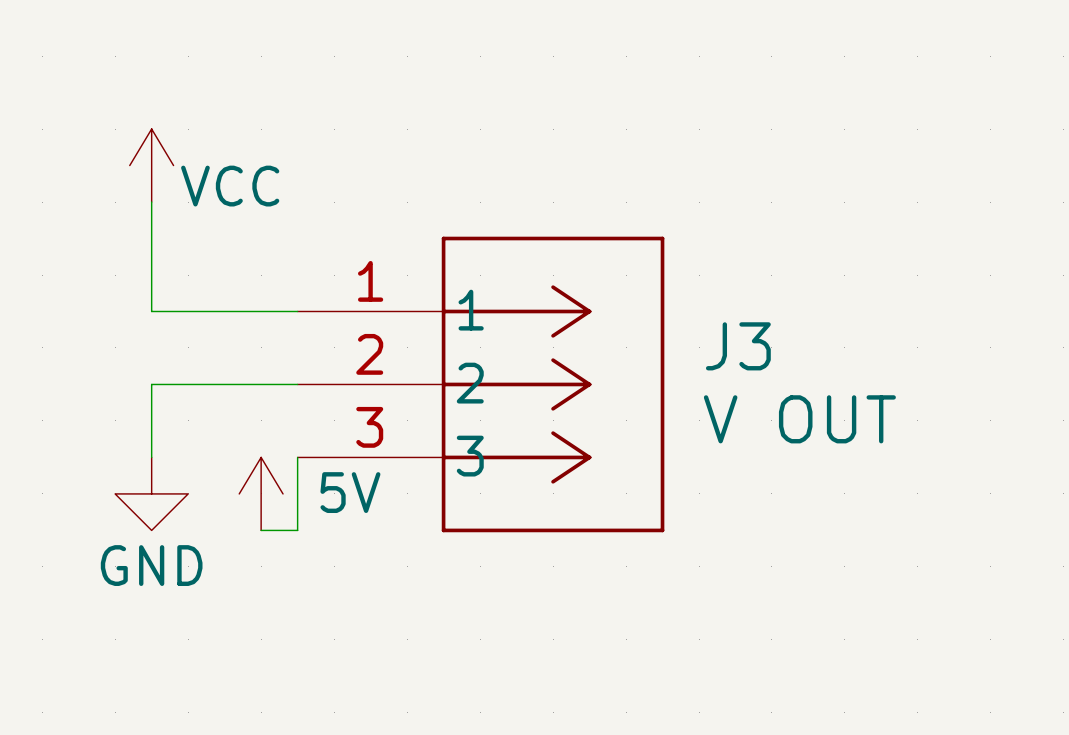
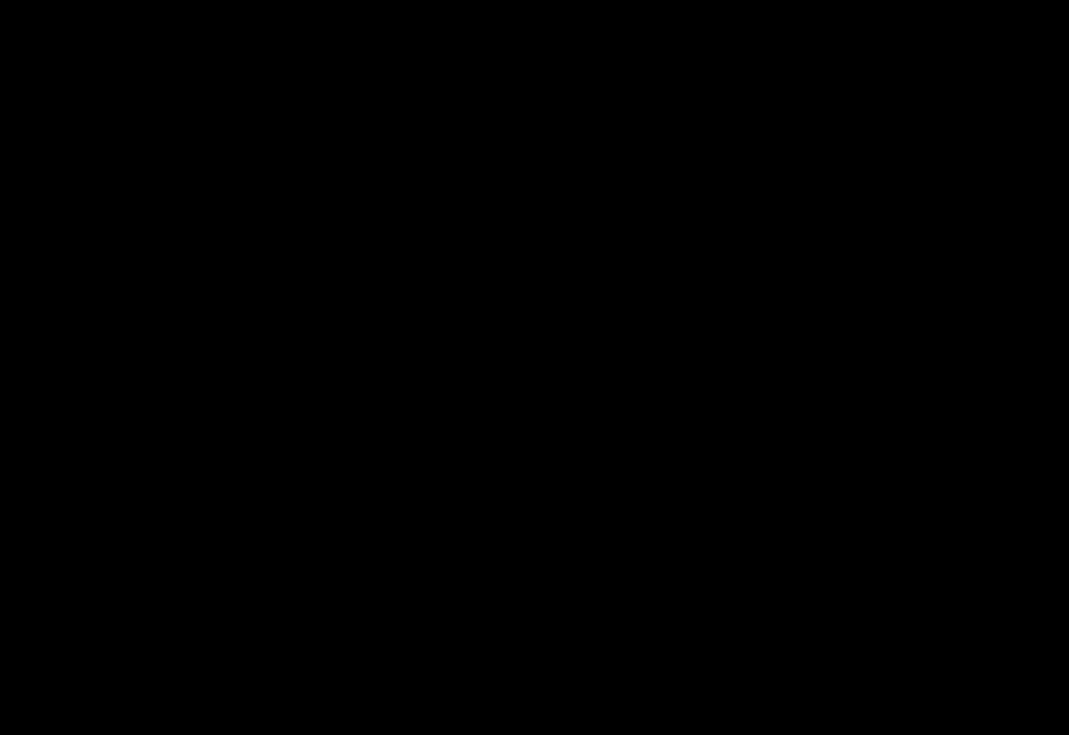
power symbol: VCC (151, 165) -> none
wire: (151, 202) (151, 311) (297, 311) -> none
wire: (297, 384) (151, 384) (151, 457) -> none
J3: V OUT (480, 384) -> none
wire: (297, 457) (297, 530) (261, 530) -> none
power symbol: GND (151, 493) -> none
power symbol: 5V (261, 493) -> none

